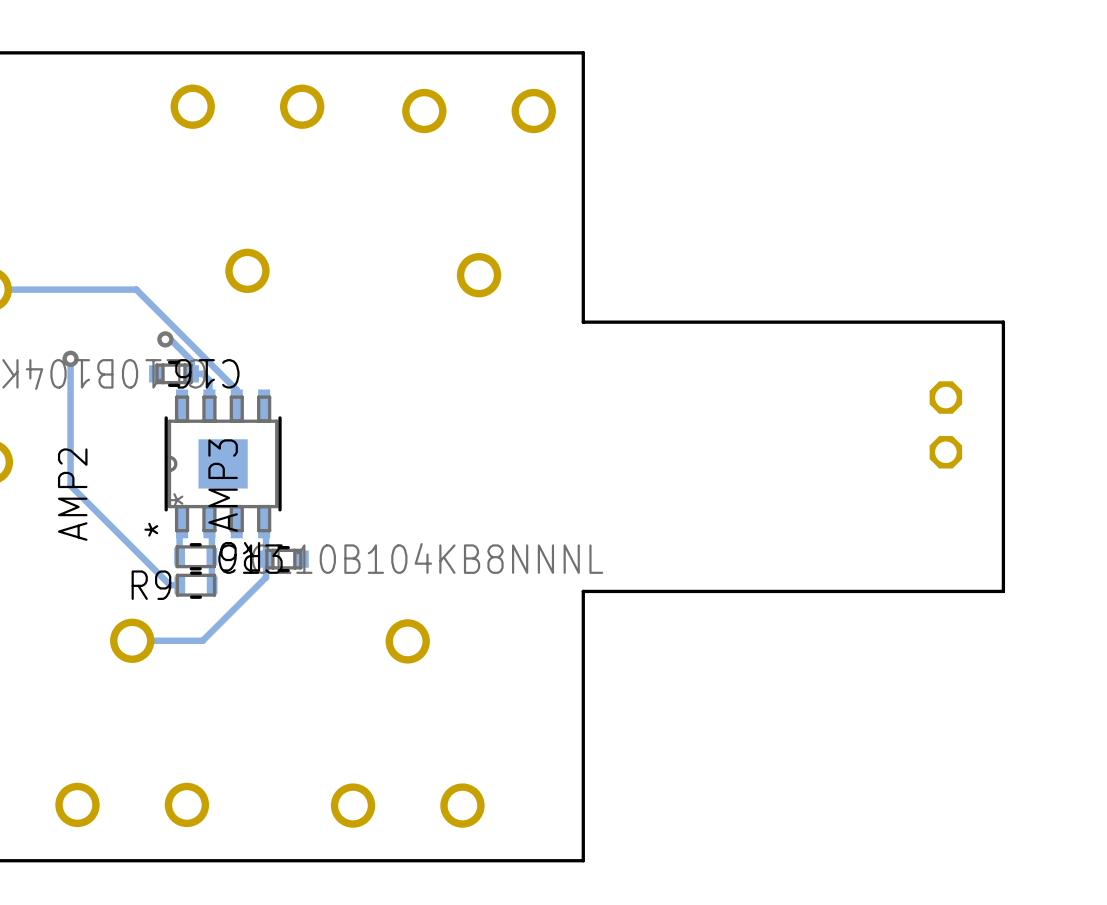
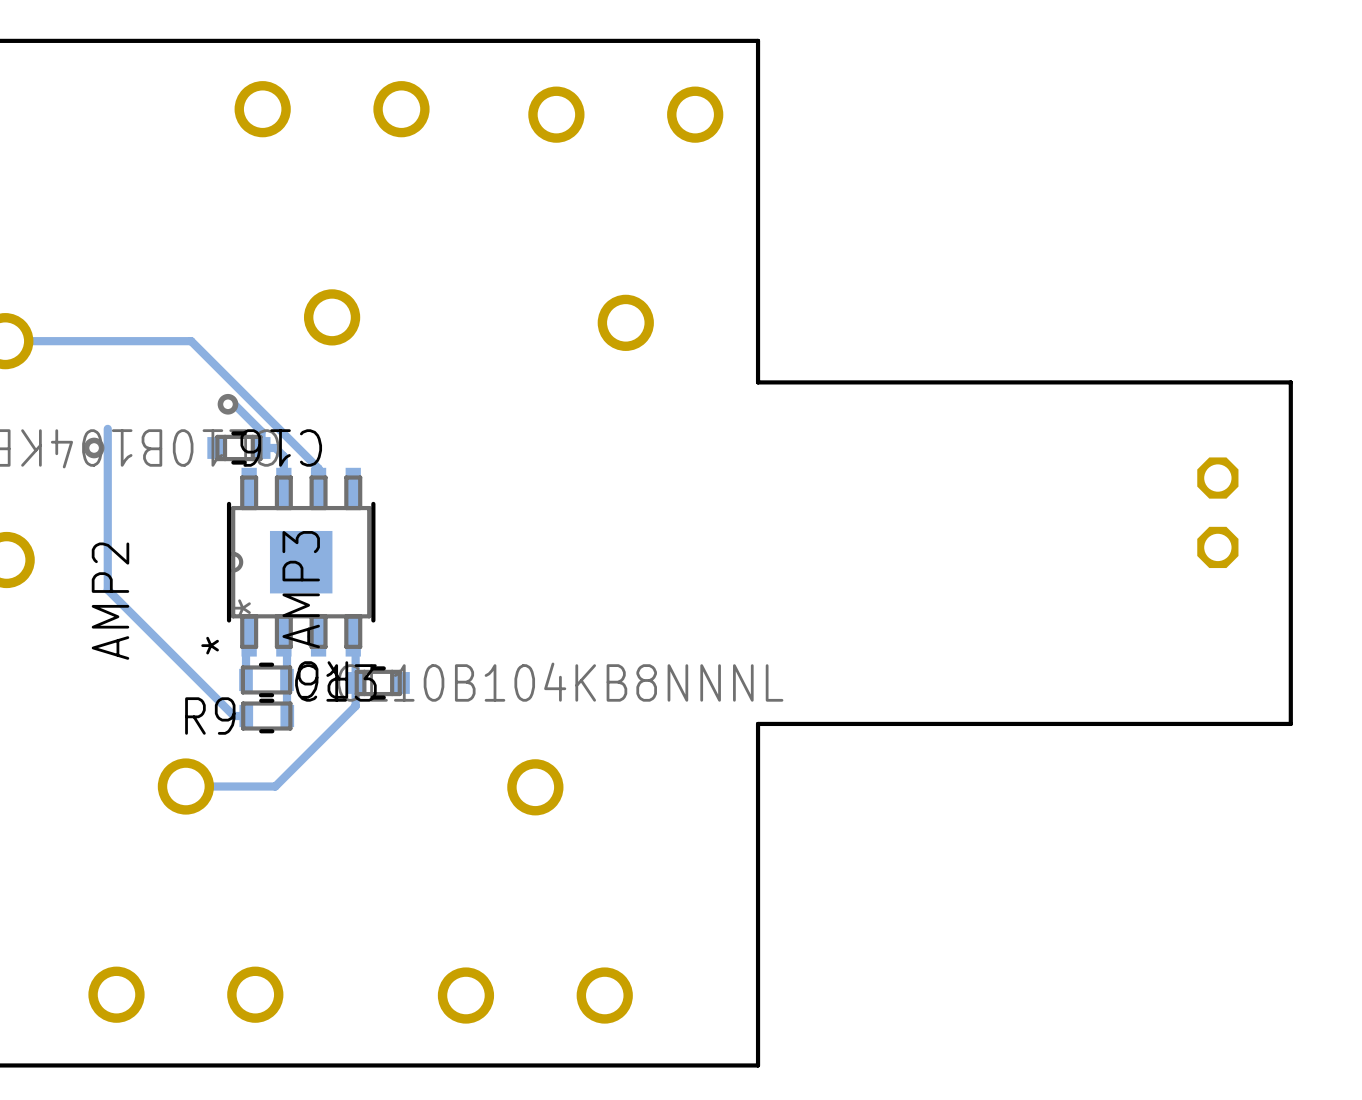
via position: (70, 358) -> (94, 447)

